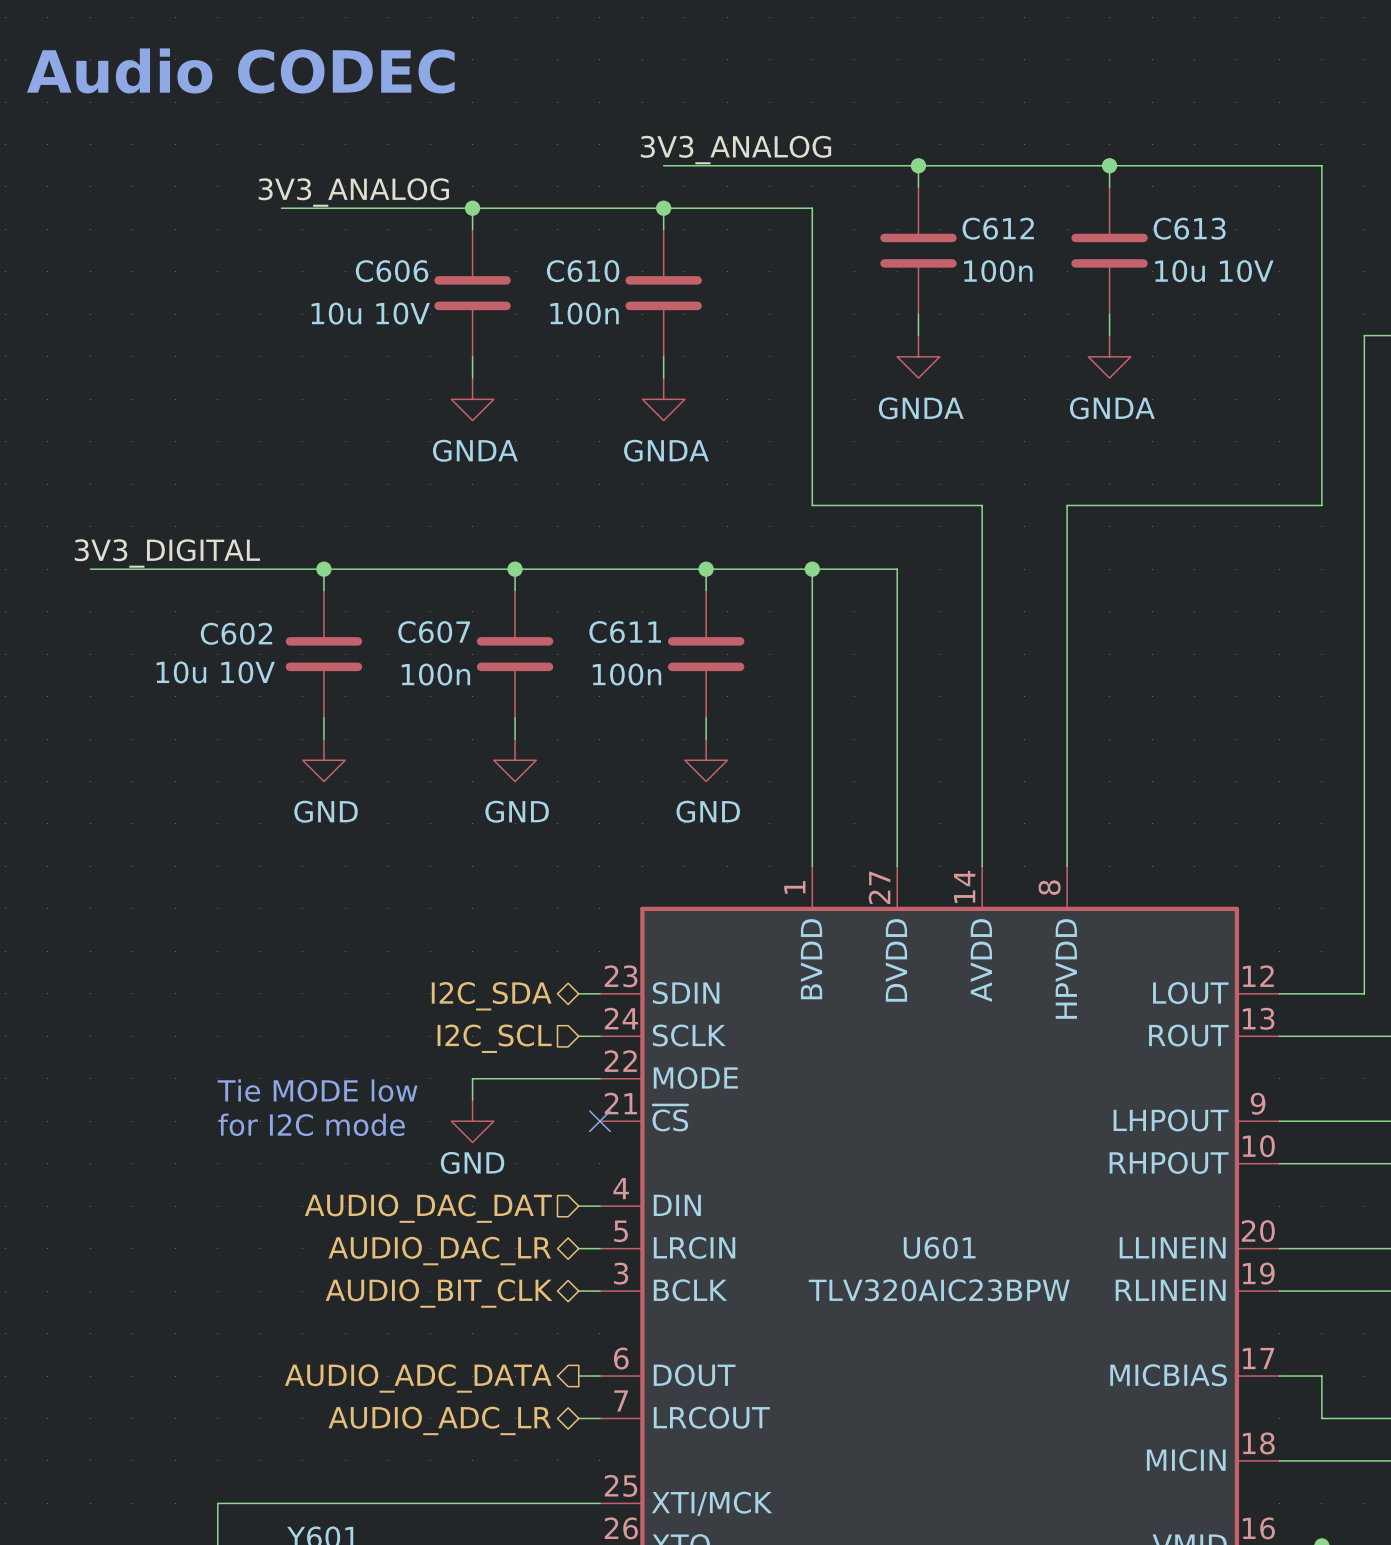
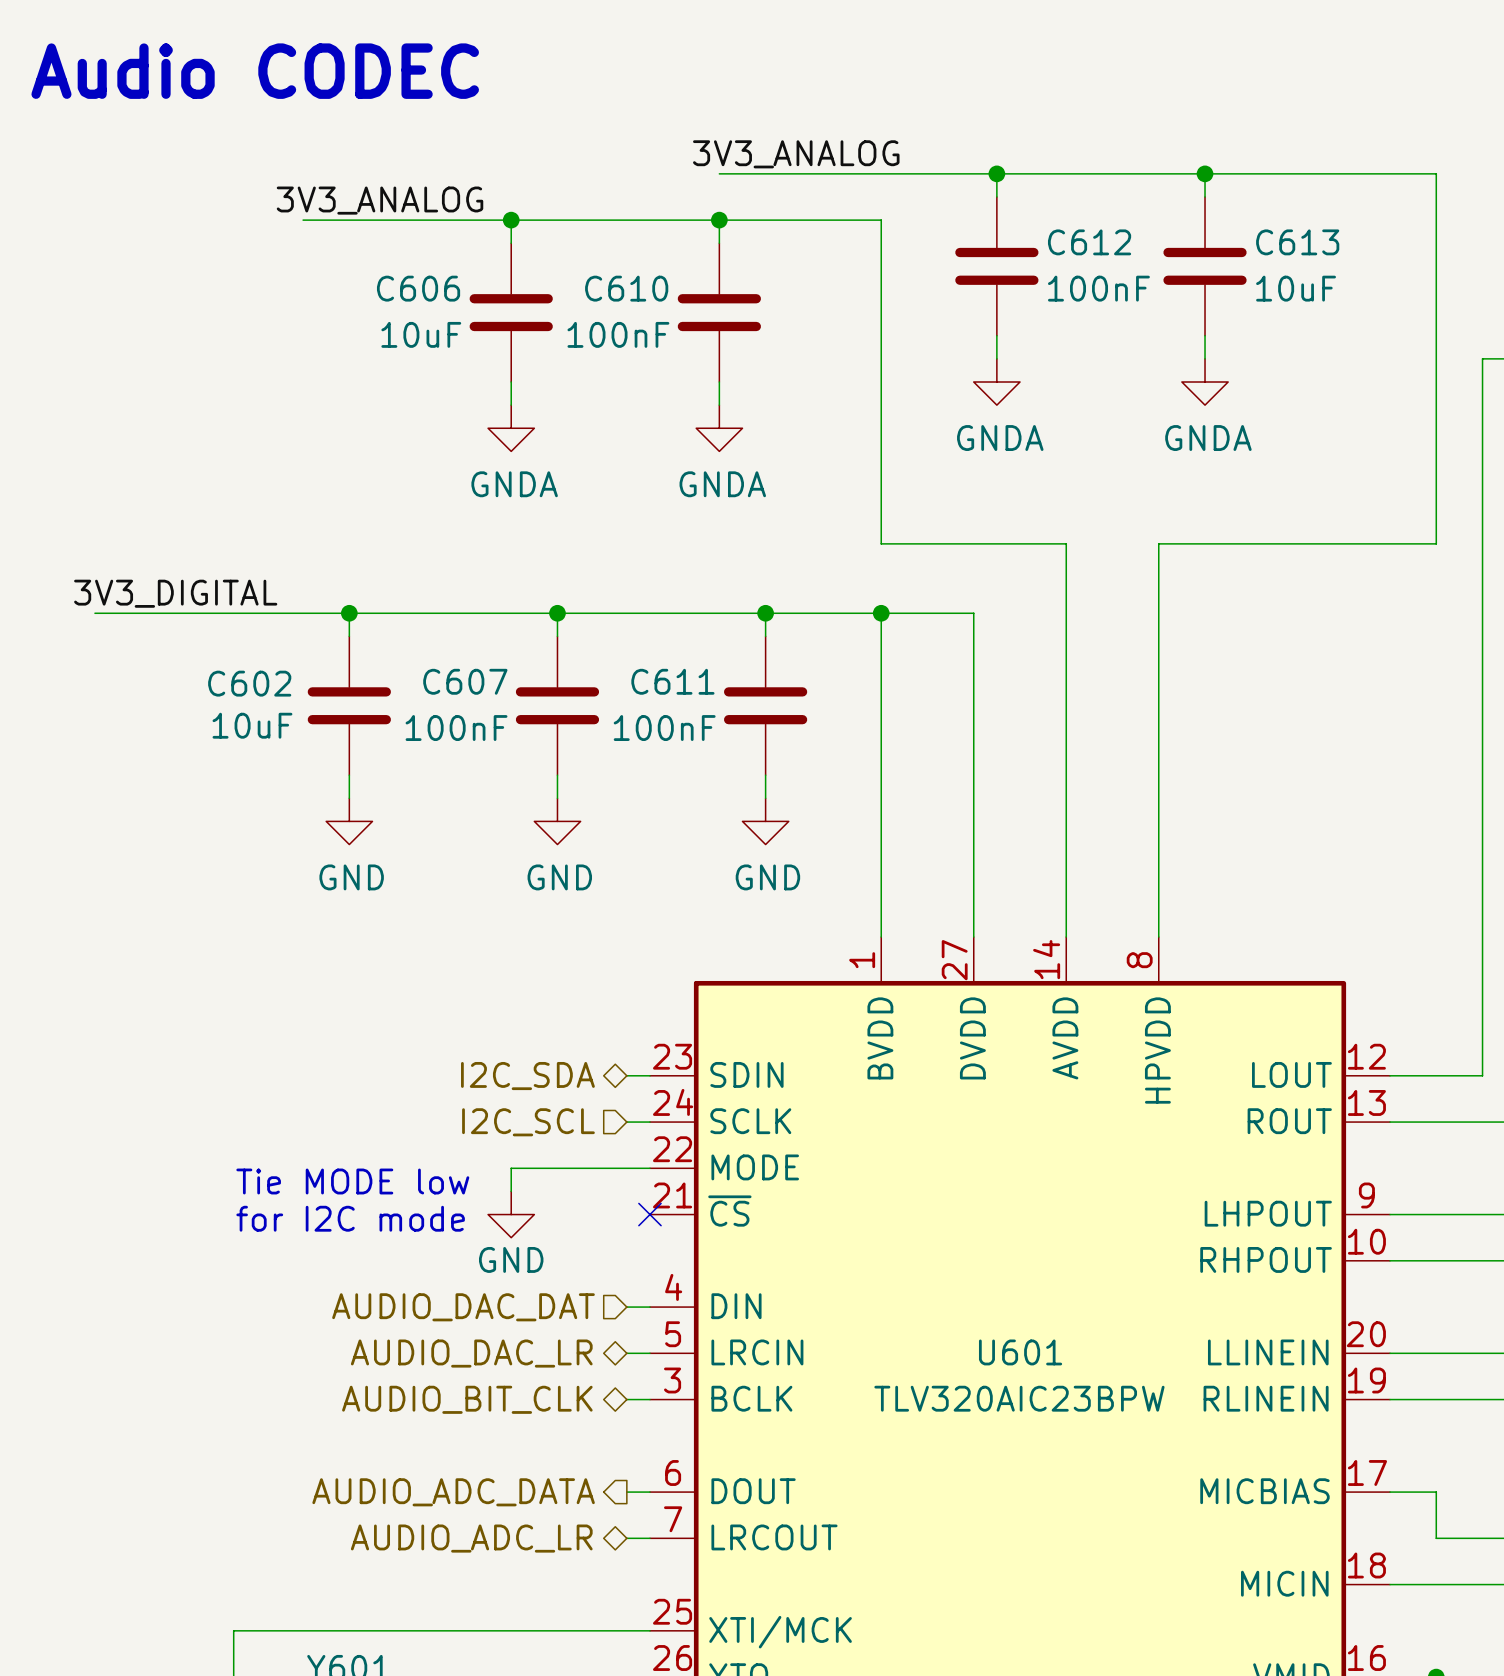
C612 value: 100n (998, 271) -> 100nF (1098, 288)
C613 value: 10u 10V (1214, 271) -> 10uF (1296, 288)
C606 value: 10u 10V (370, 313) -> 10uF (421, 334)
C610 value: 100n (584, 313) -> 100nF (618, 334)
C602 value: 10u 10V (215, 672) -> 10uF (252, 725)
C607 value: 100n (435, 674) -> 100nF (456, 728)
C611 value: 100n (627, 674) -> 100nF (664, 728)

